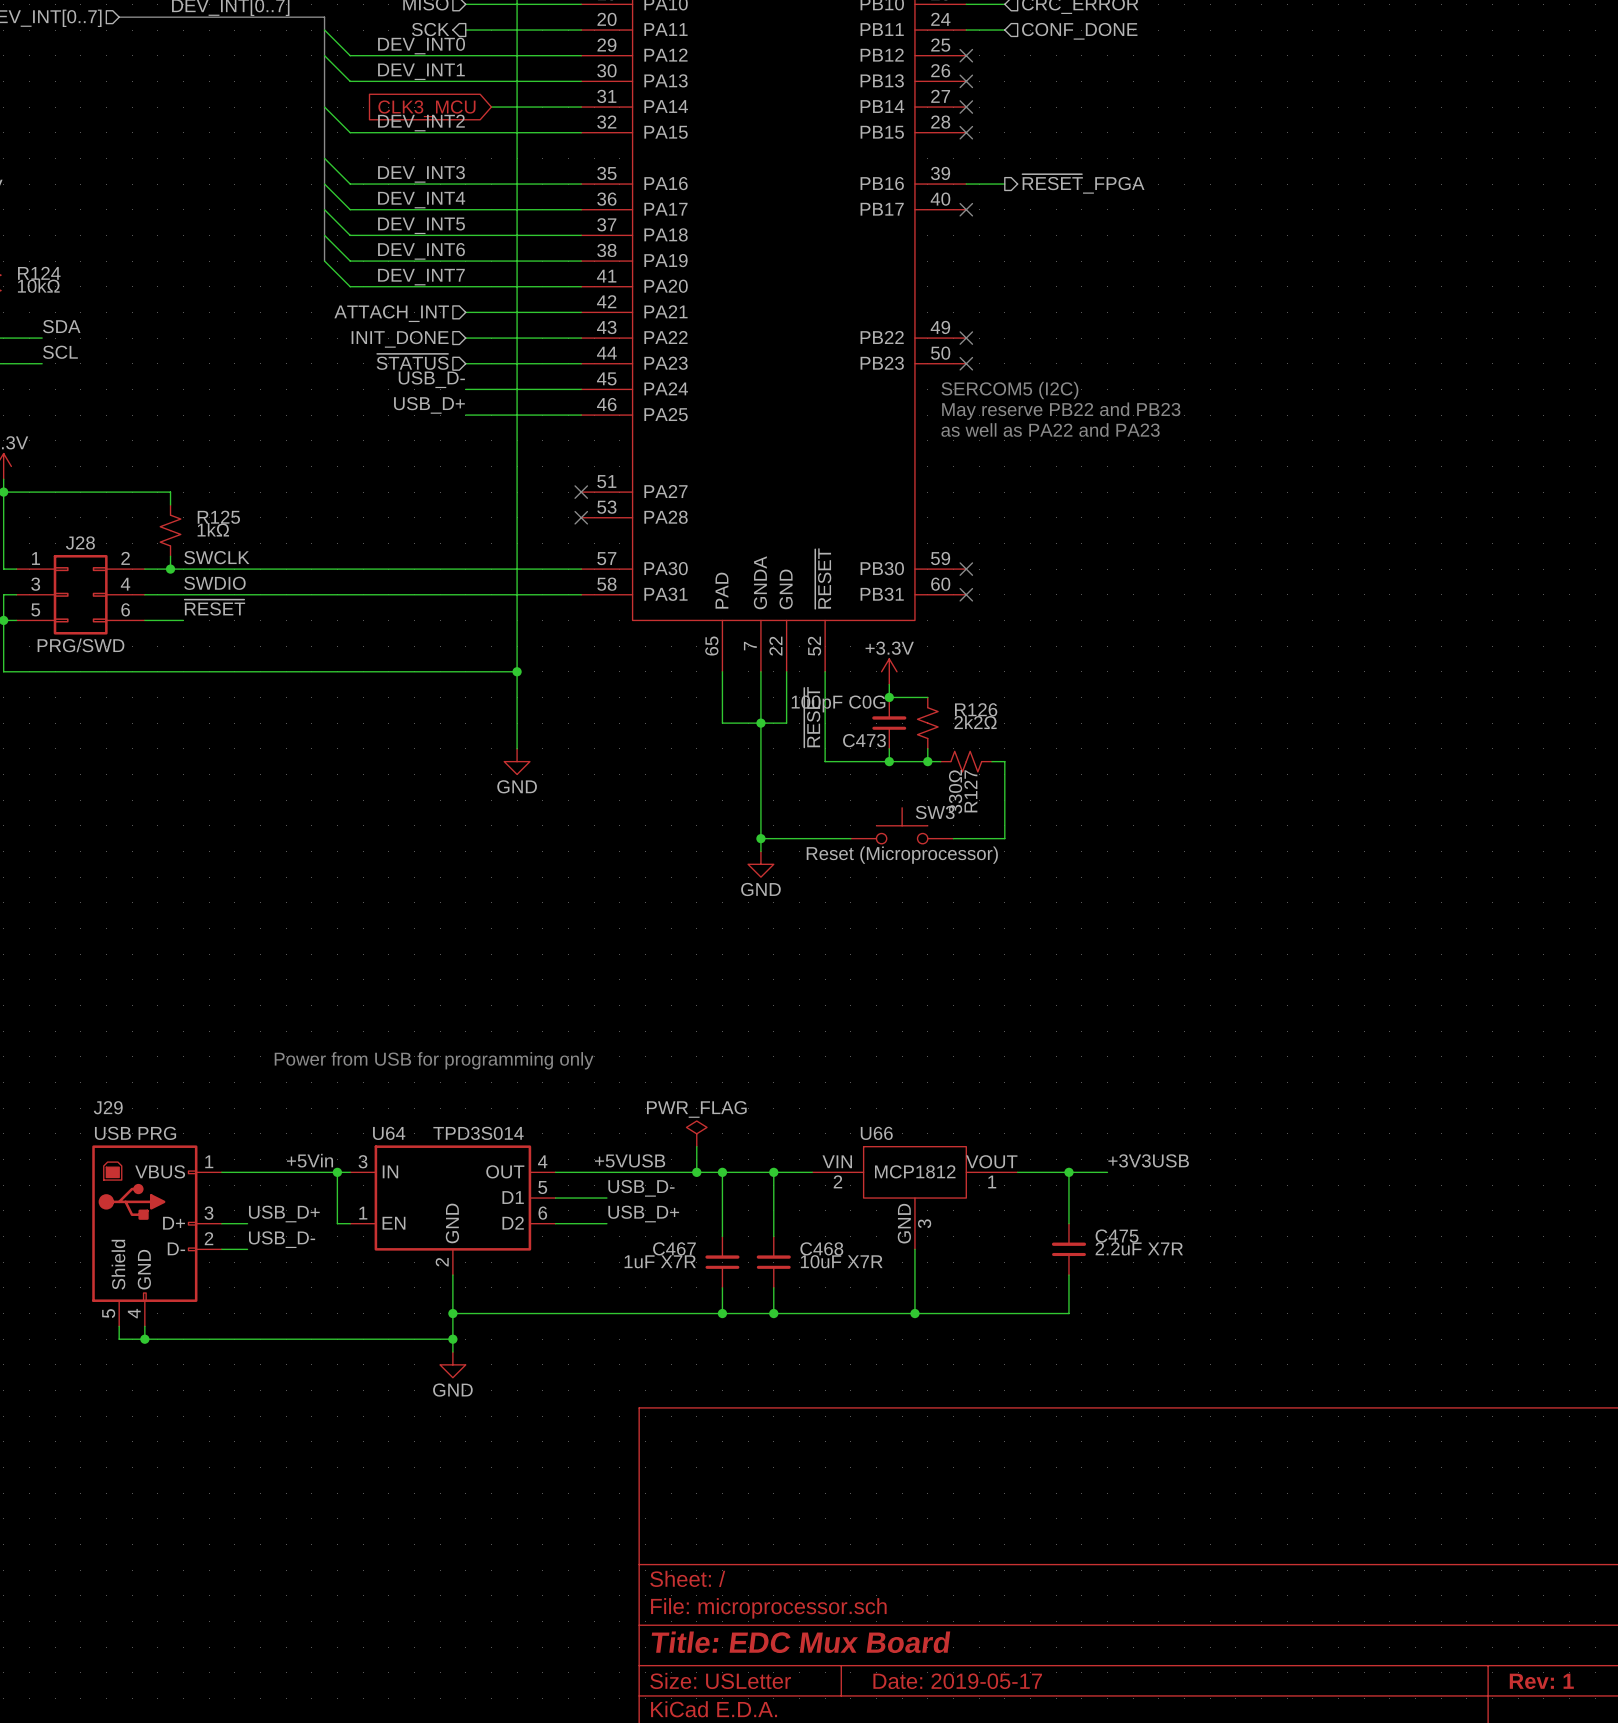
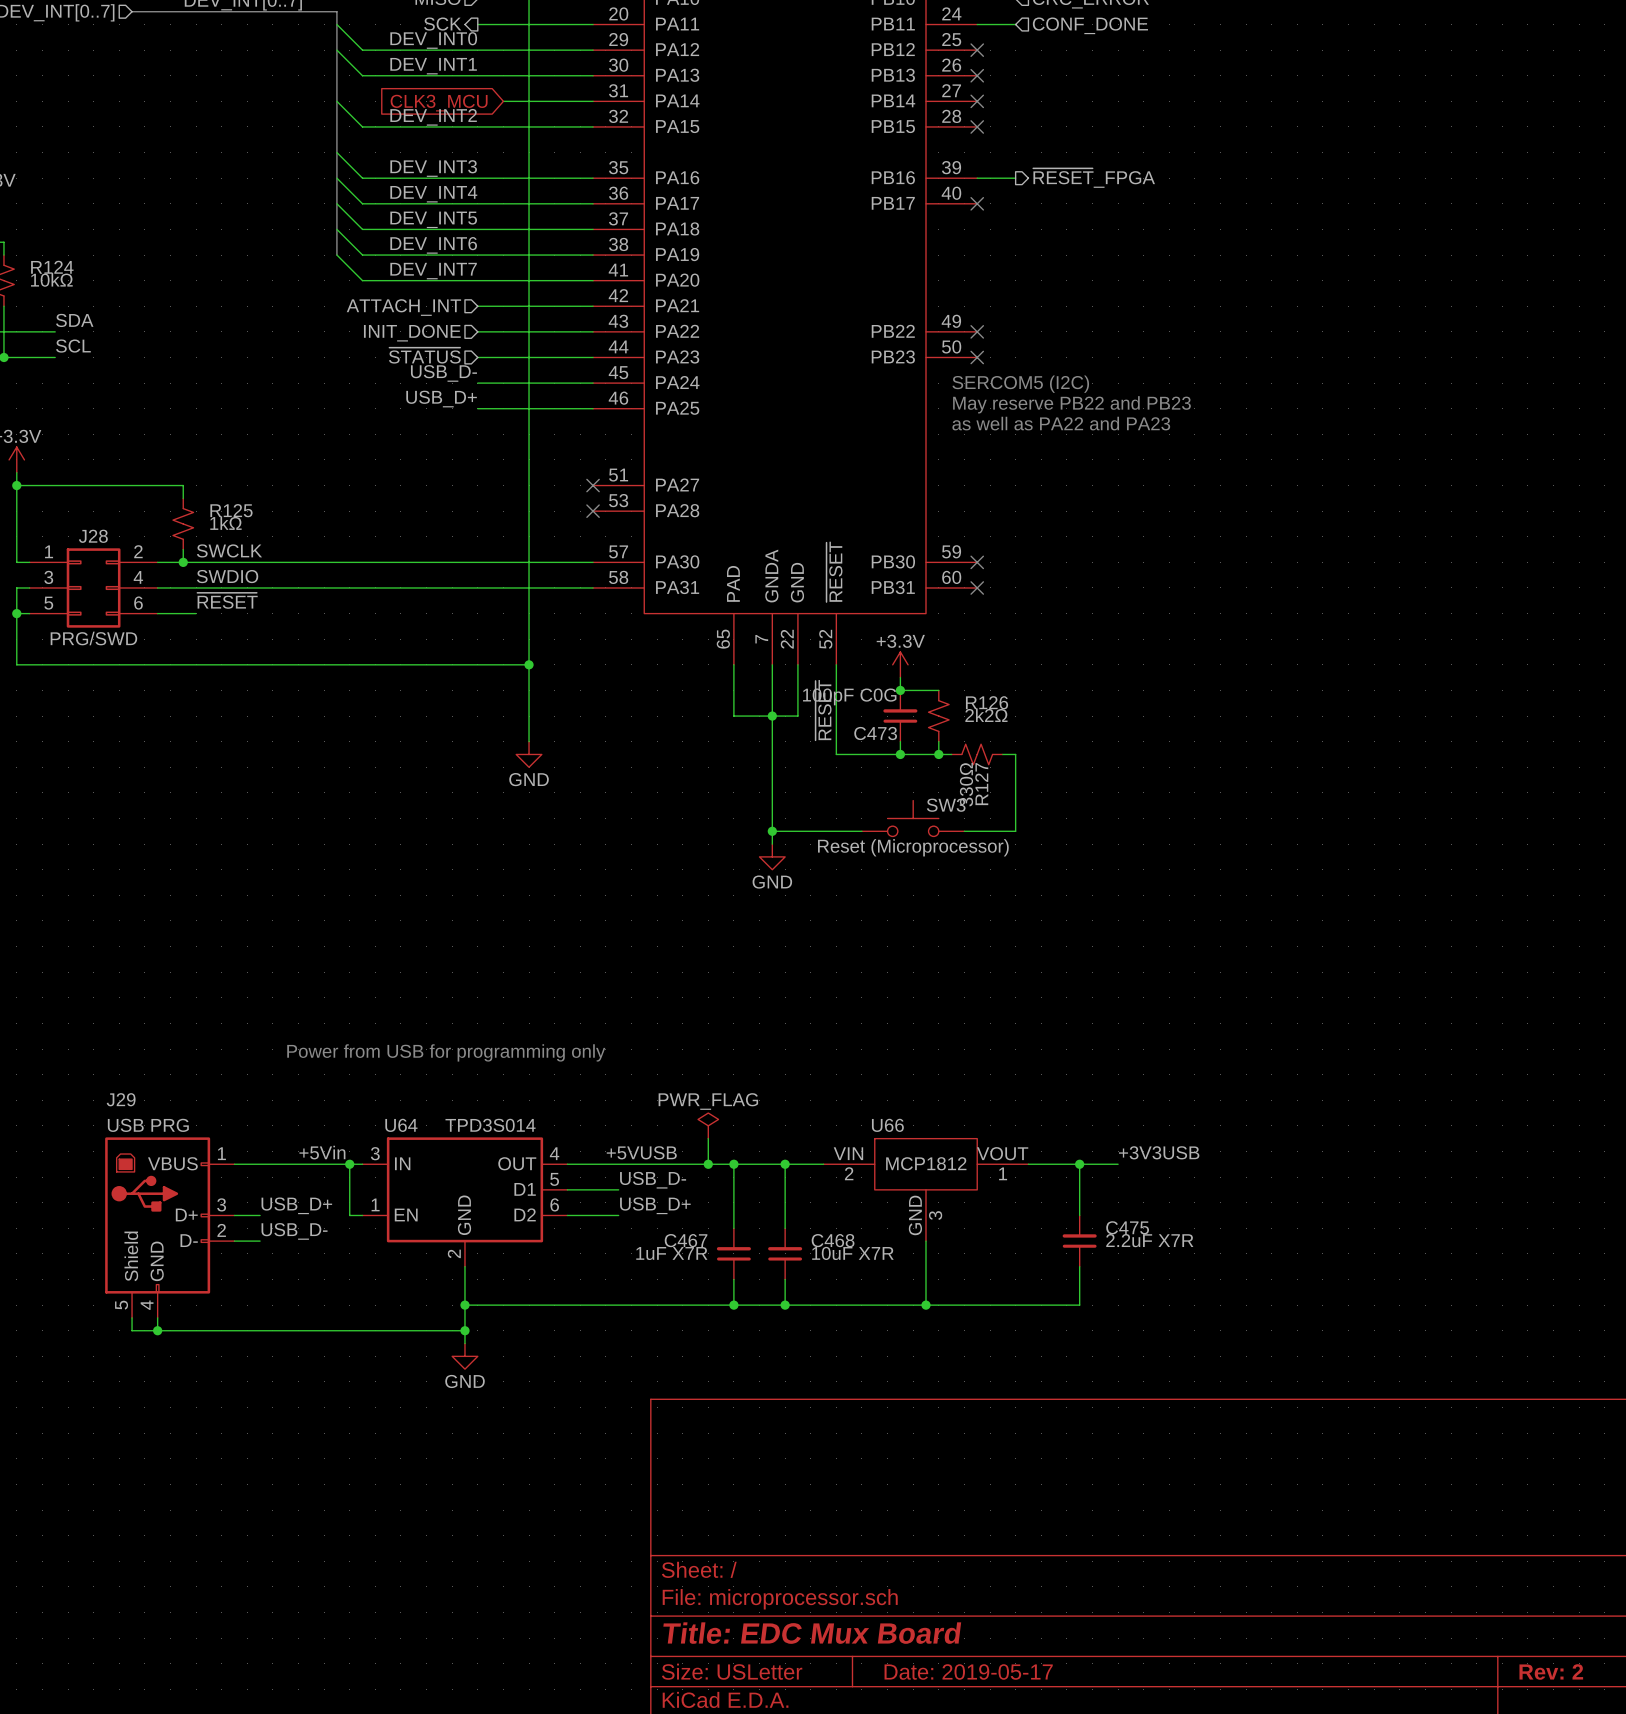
title block: Rev: 1 (1541, 1681) -> Rev: 2 (1551, 1671)

